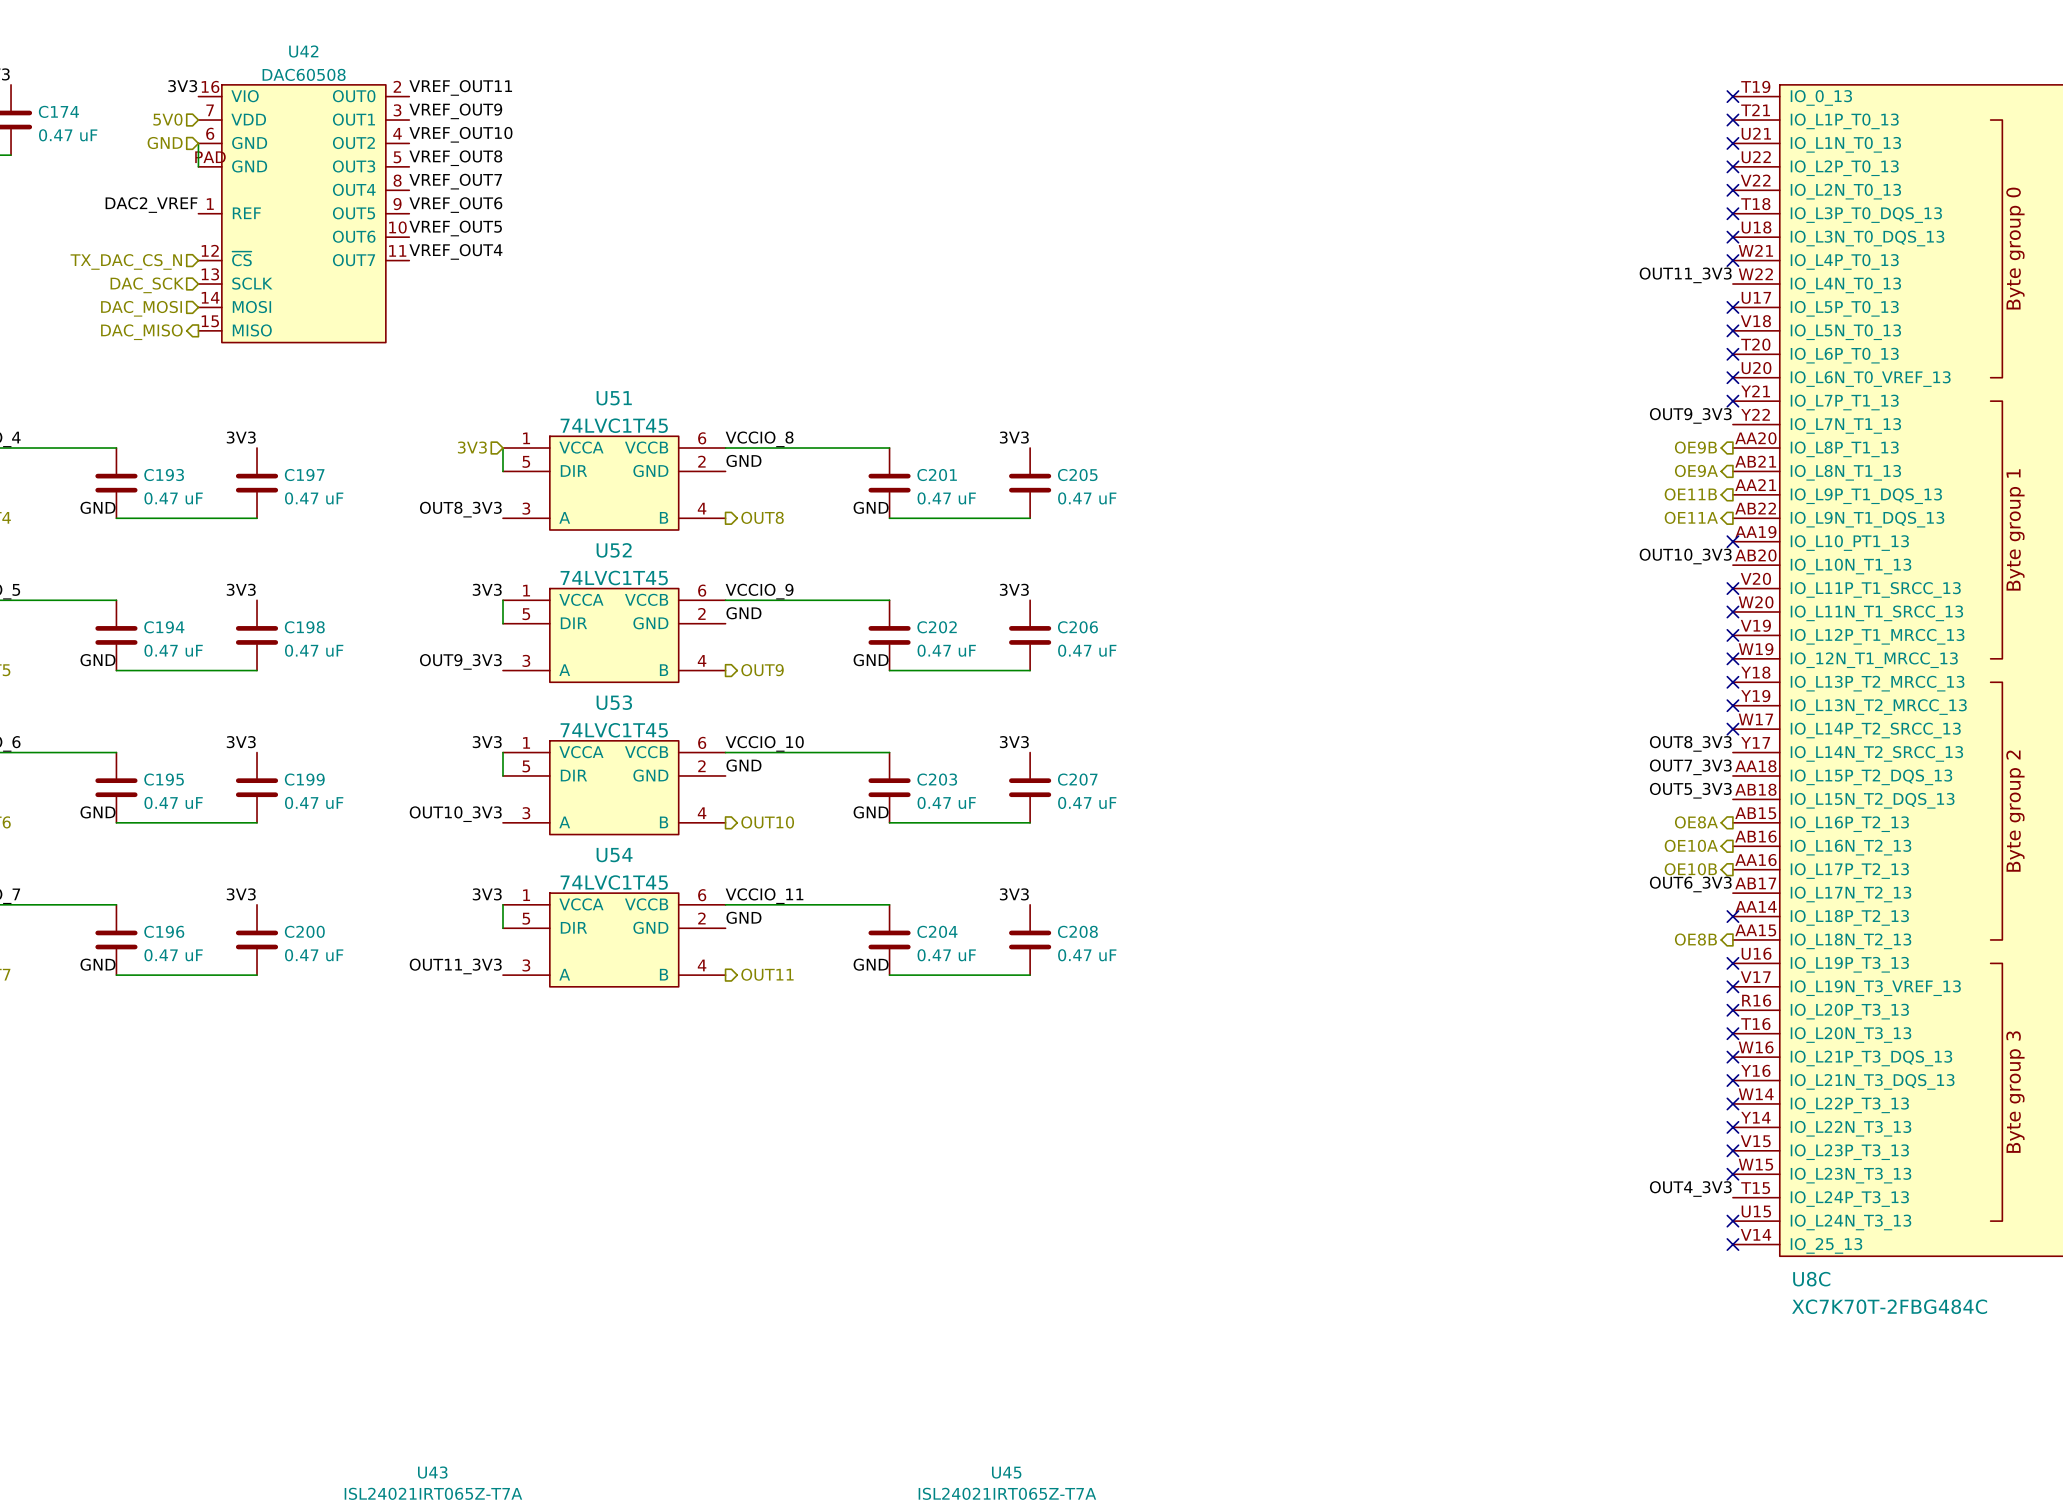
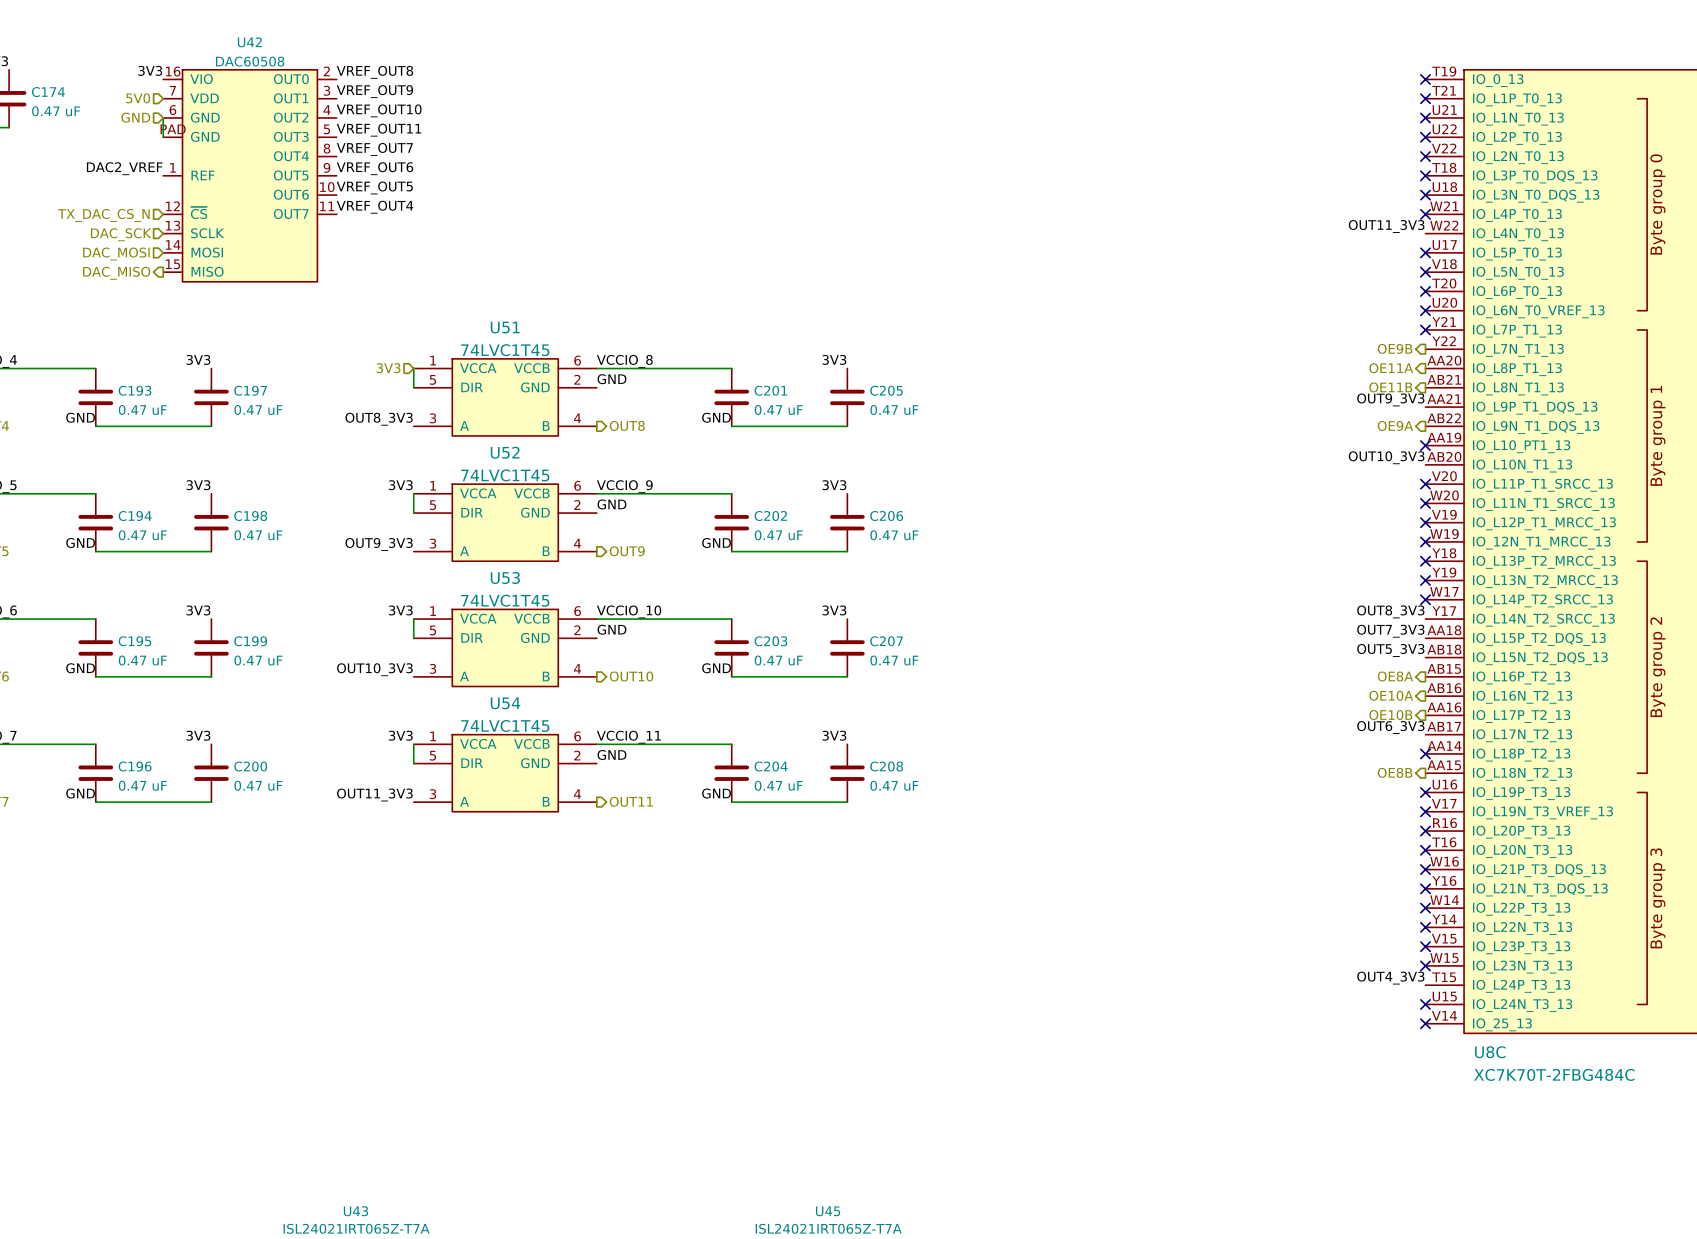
label: VREF_OUT11 (460, 87) -> VREF_OUT8 (374, 72)
label: VREF_OUT8 (455, 158) -> VREF_OUT11 (378, 130)
label position: OUT9_3V3 (1690, 415) -> OUT9_3V3 (1390, 399)
hierarchical label: none -> OE9B (1395, 348)
hierarchical label: OE9B (1695, 447) -> OE11A (1391, 368)
hierarchical label: OE9A (1696, 471) -> OE11B (1390, 387)
hierarchical label: OE11B (1690, 494) -> none
hierarchical label: OE11A (1691, 517) -> OE9A (1395, 425)

